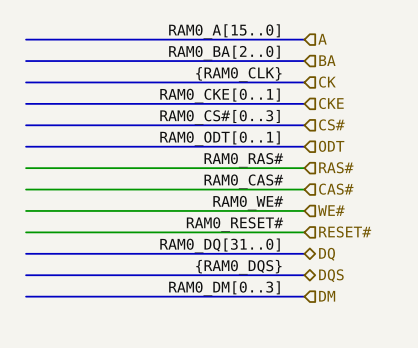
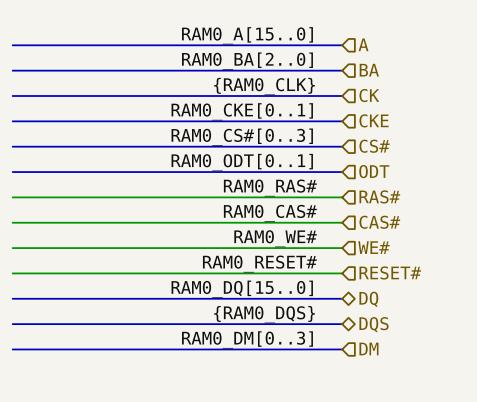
label: RAM0_DQ[31..0] (220, 245) -> RAM0_DQ[15..0] (242, 289)

